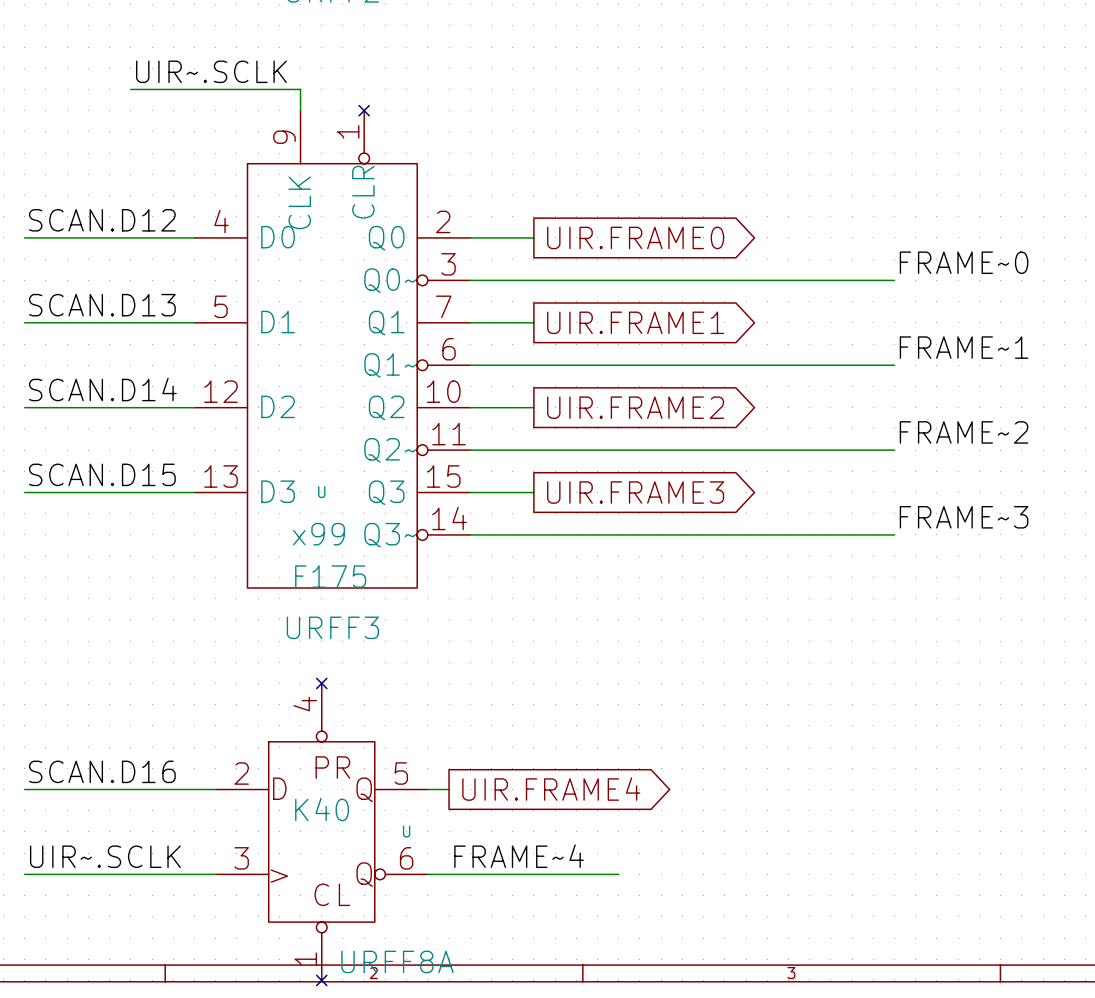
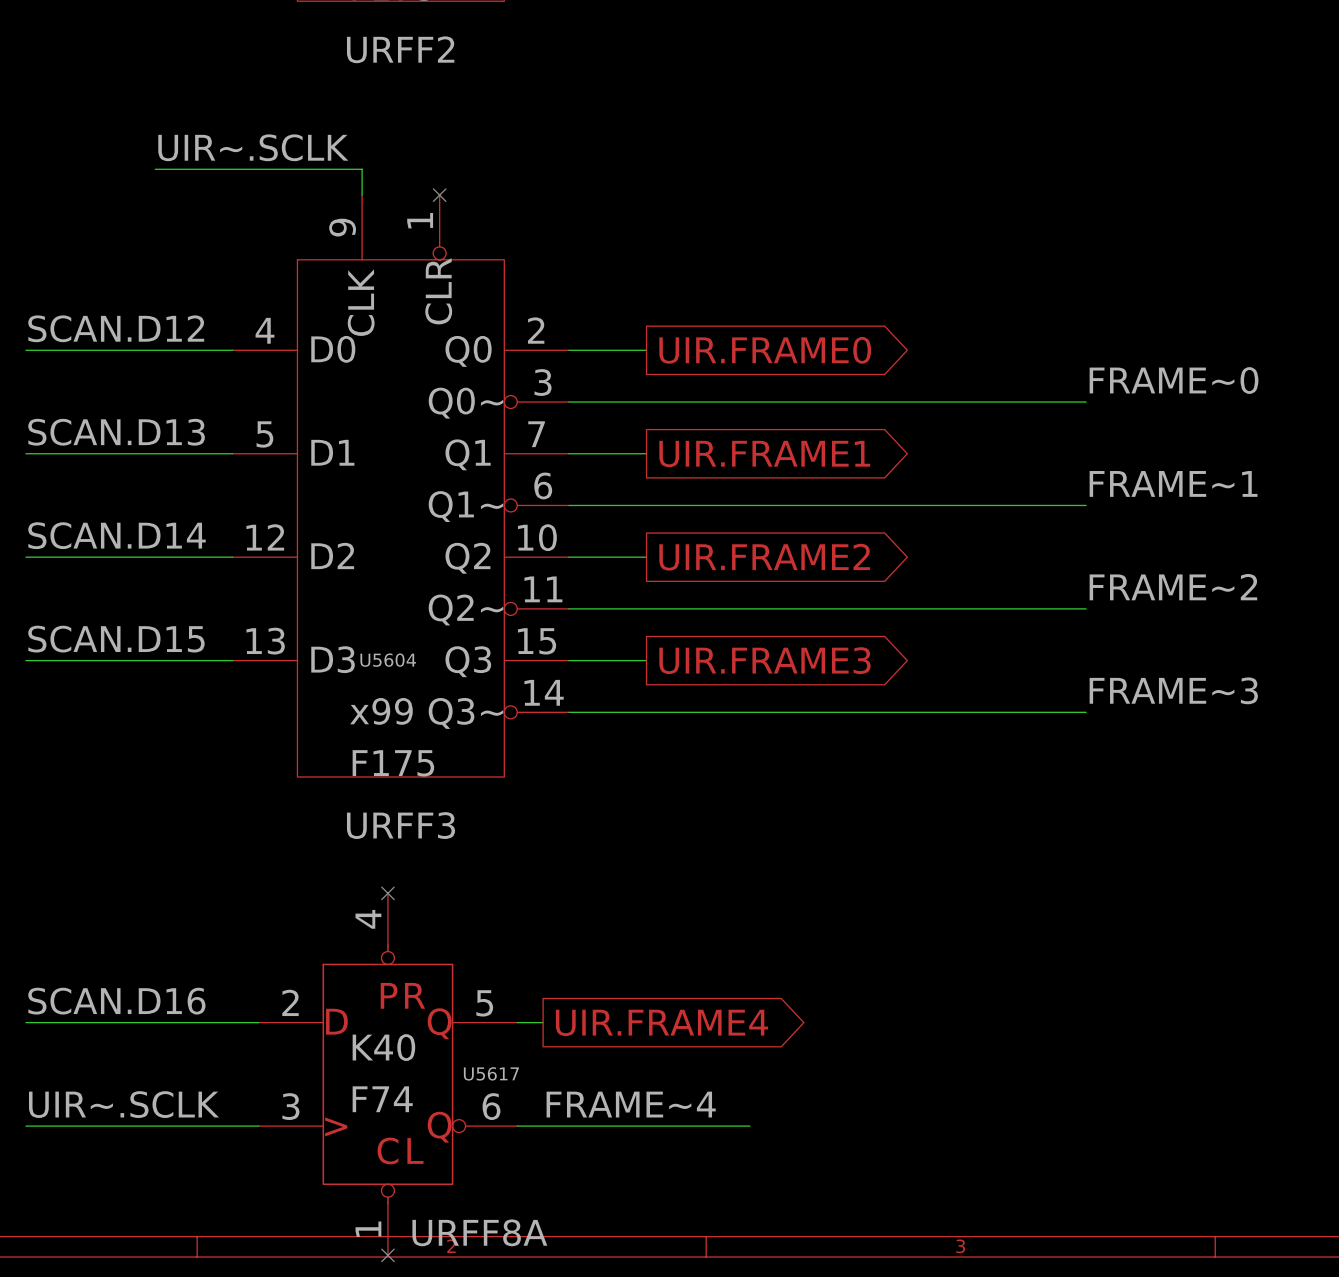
U name: U (321, 492) -> U5604 (388, 660)
U name: U (406, 831) -> U5617 (491, 1073)
U value: none -> F74 (382, 1099)

